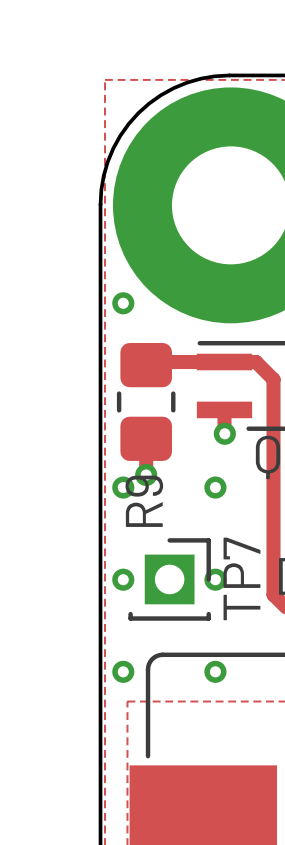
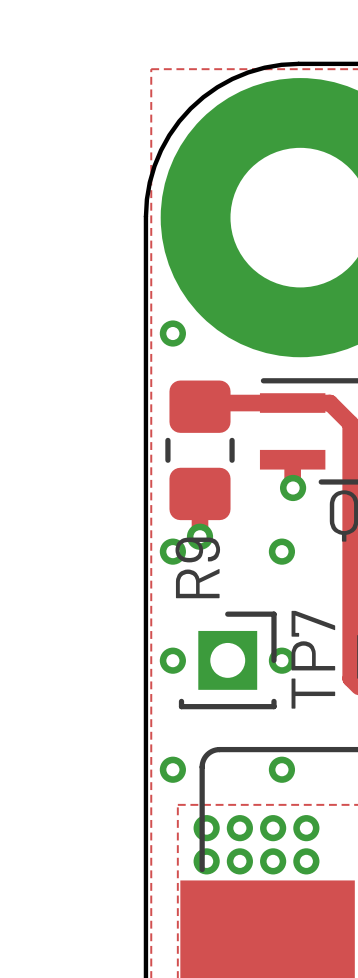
via: none -> (206, 828)
via: none -> (239, 828)
via: none -> (273, 828)
via: none -> (306, 828)
via: none -> (206, 861)
via: none -> (239, 861)
via: none -> (273, 861)
via: none -> (306, 861)

